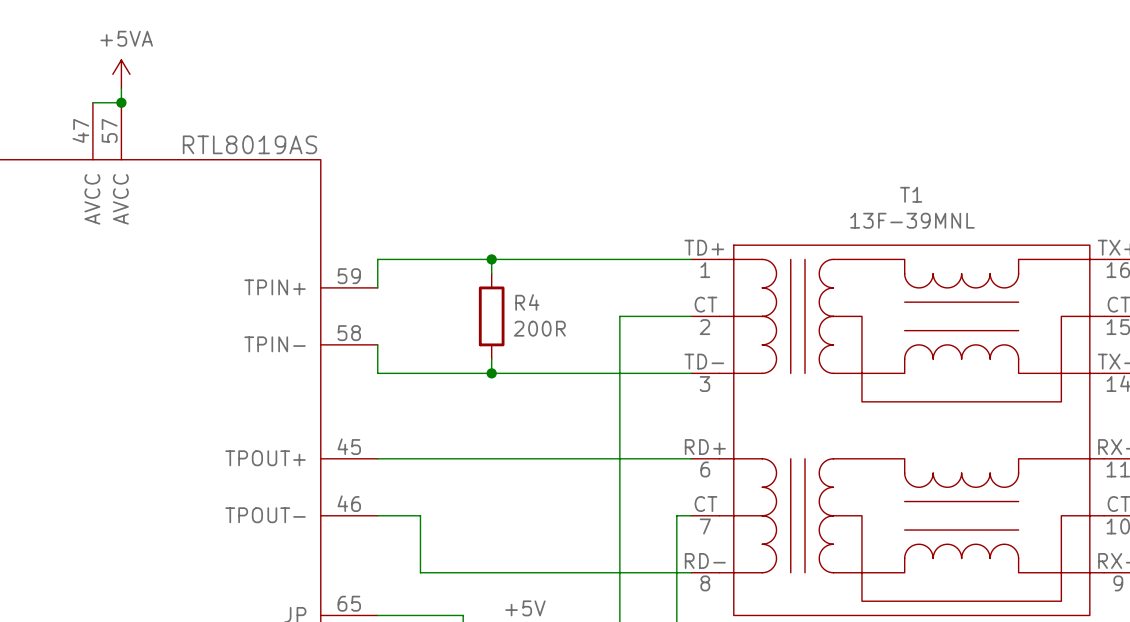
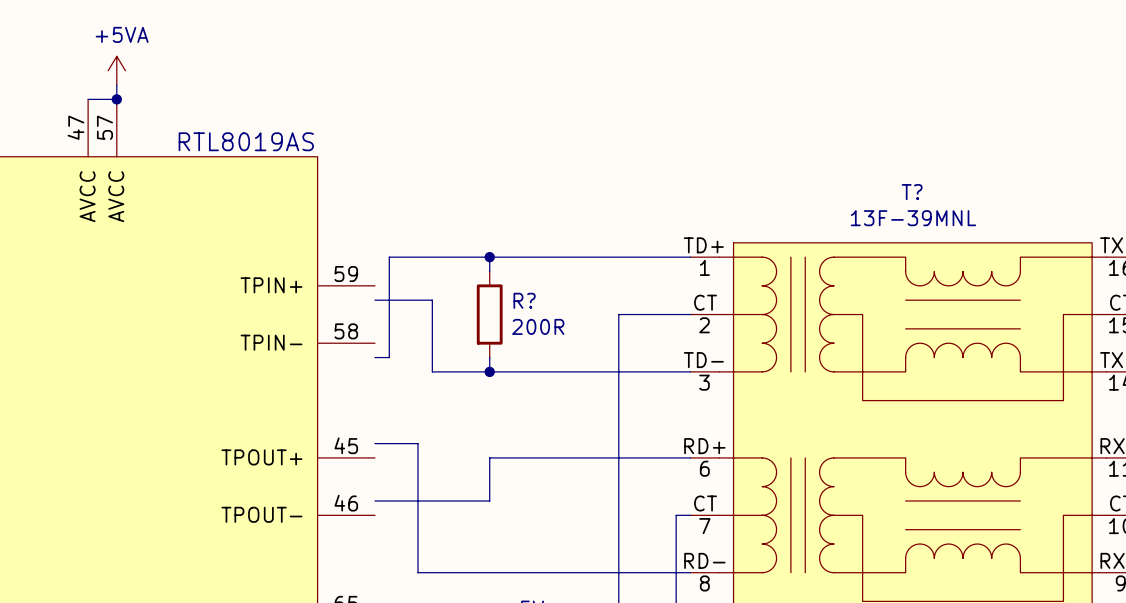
T1 name: T1 (911, 194) -> T? (912, 192)
wire: (391, 259) (377, 259) (377, 287) -> (389, 257) (389, 357) (374, 357)
R4 name: R4 (527, 302) -> R? (524, 300)
wire: (377, 344) (377, 373) (434, 373) -> (374, 300) (432, 300) (432, 371)
wire: (377, 458) (491, 458) -> (374, 500) (489, 500) (489, 457)
wire: (377, 515) (420, 515) -> (374, 443) (418, 443) (418, 515)

